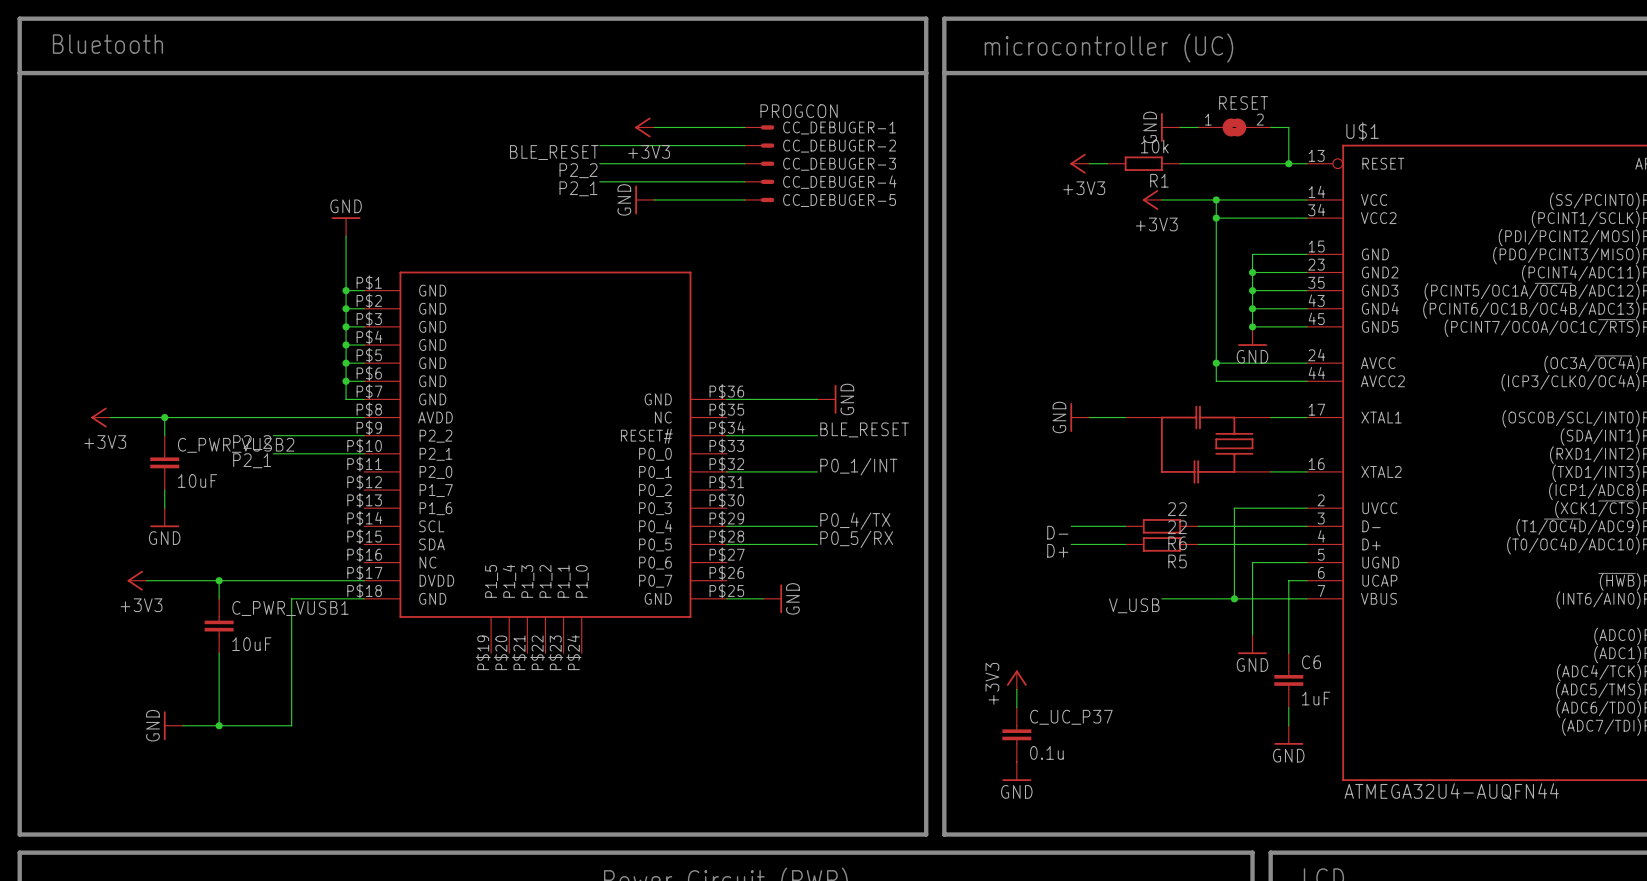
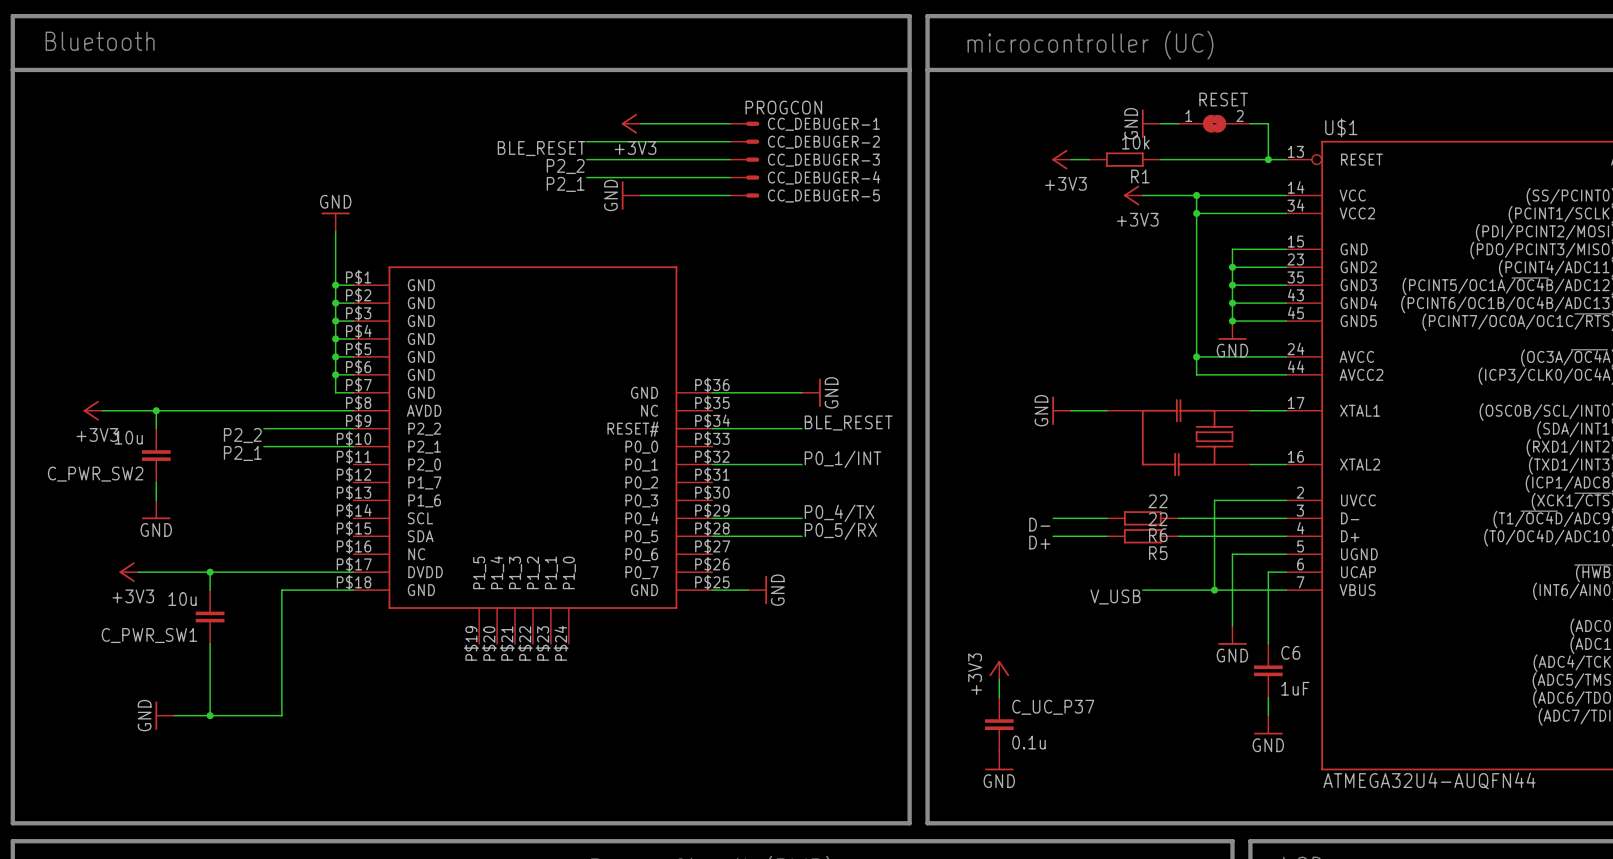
C_PWR_VUSB2 name: C_PWR_VUSB2 (236, 445) -> C_PWR_SW2 (95, 474)
C_PWR_VUSB2 value: 10uF (197, 481) -> 10u (128, 437)
C_PWR_VUSB1 name: C_PWR_VUSB1 (290, 608) -> C_PWR_SW1 (149, 635)
C_PWR_VUSB1 value: 10uF (251, 644) -> 10u (182, 599)

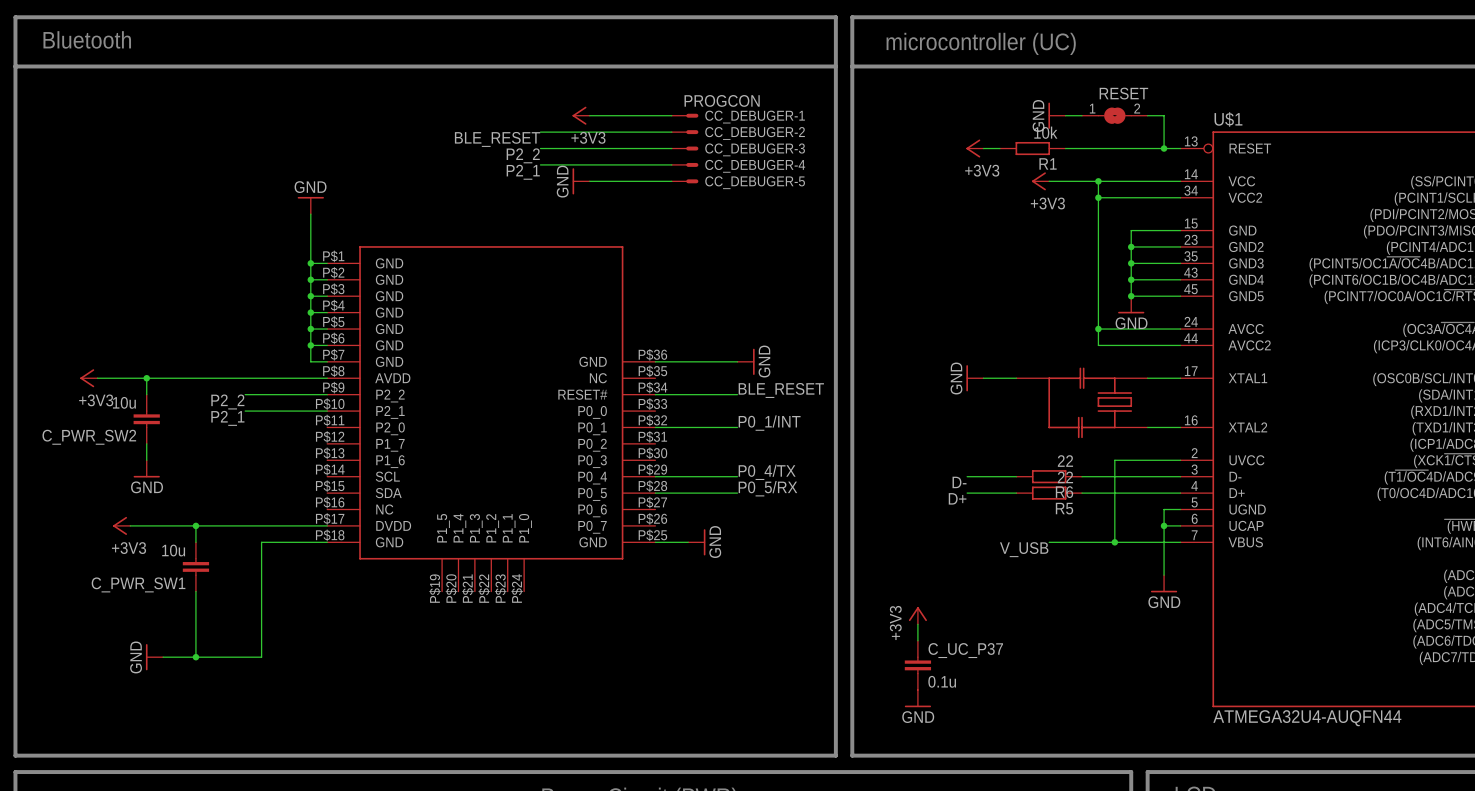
wire: (1268, 554) (1232, 554) (1232, 625) -> (1164, 509) (1164, 525)
junction: none -> (1164, 525)
power symbol position: GND (1232, 635) -> GND (1164, 583)
C6: 1uF (1268, 670) -> none
wire: (1268, 697) (1268, 715) -> none
power symbol: GND (1268, 725) -> none

